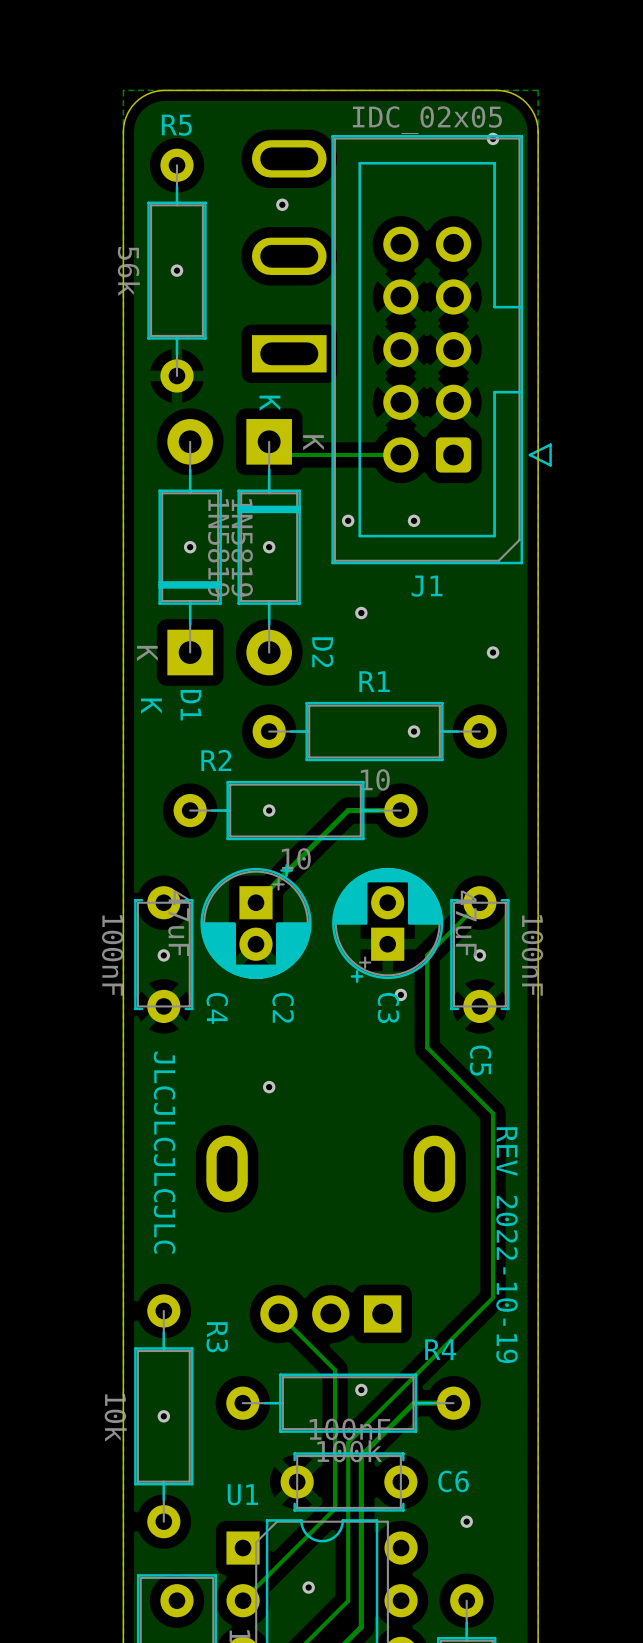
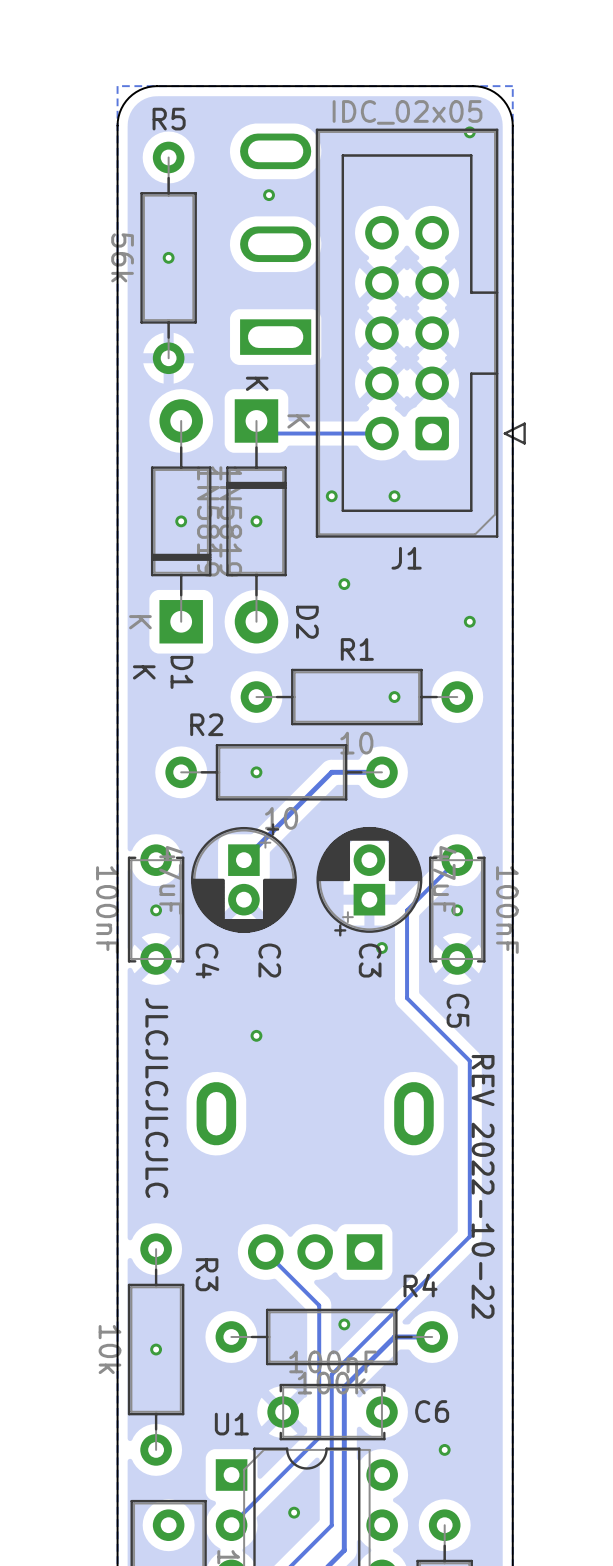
text: REV 2022-10-19 (506, 1245) -> REV 2022-10-22 (483, 1186)

